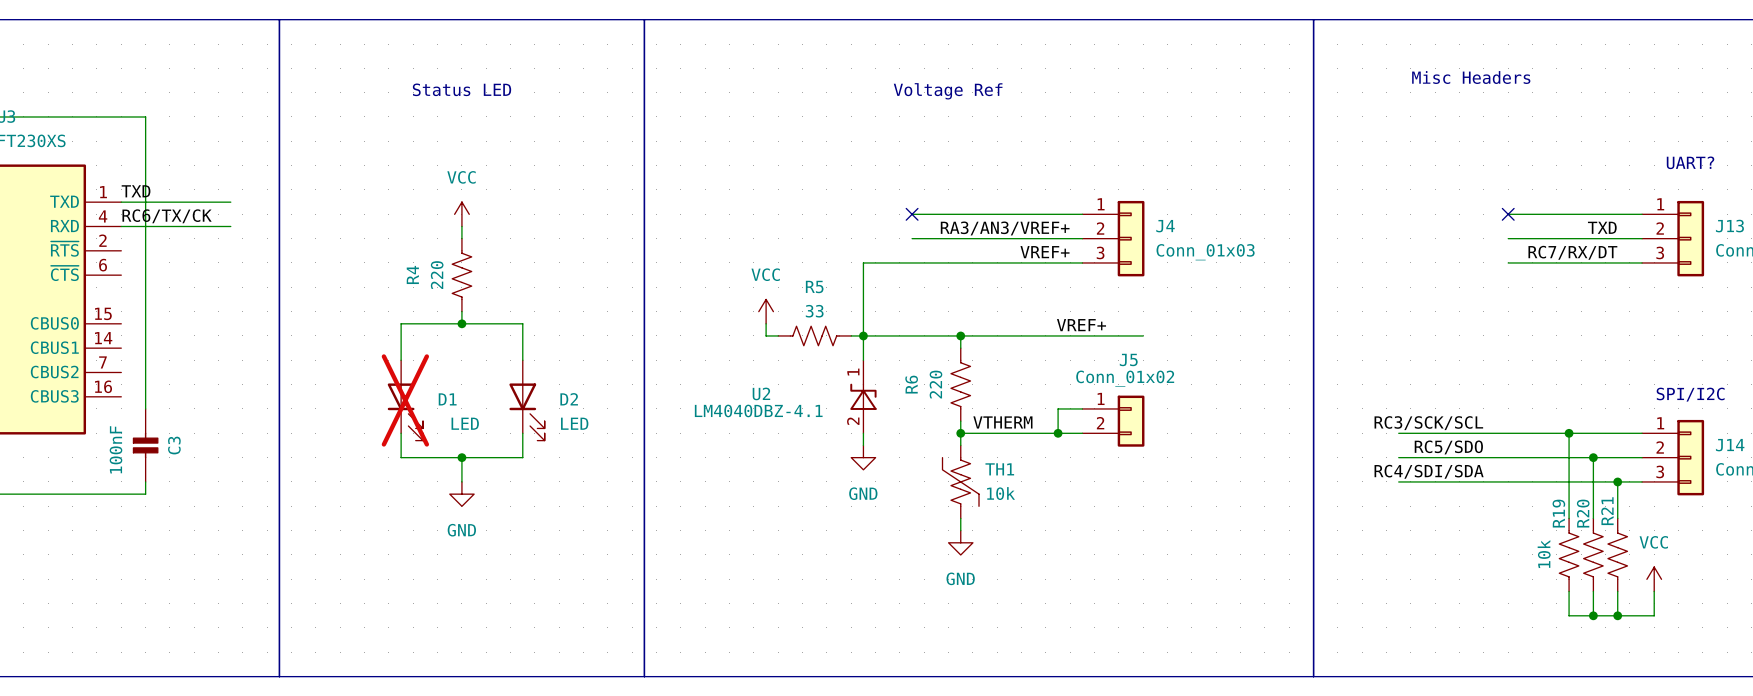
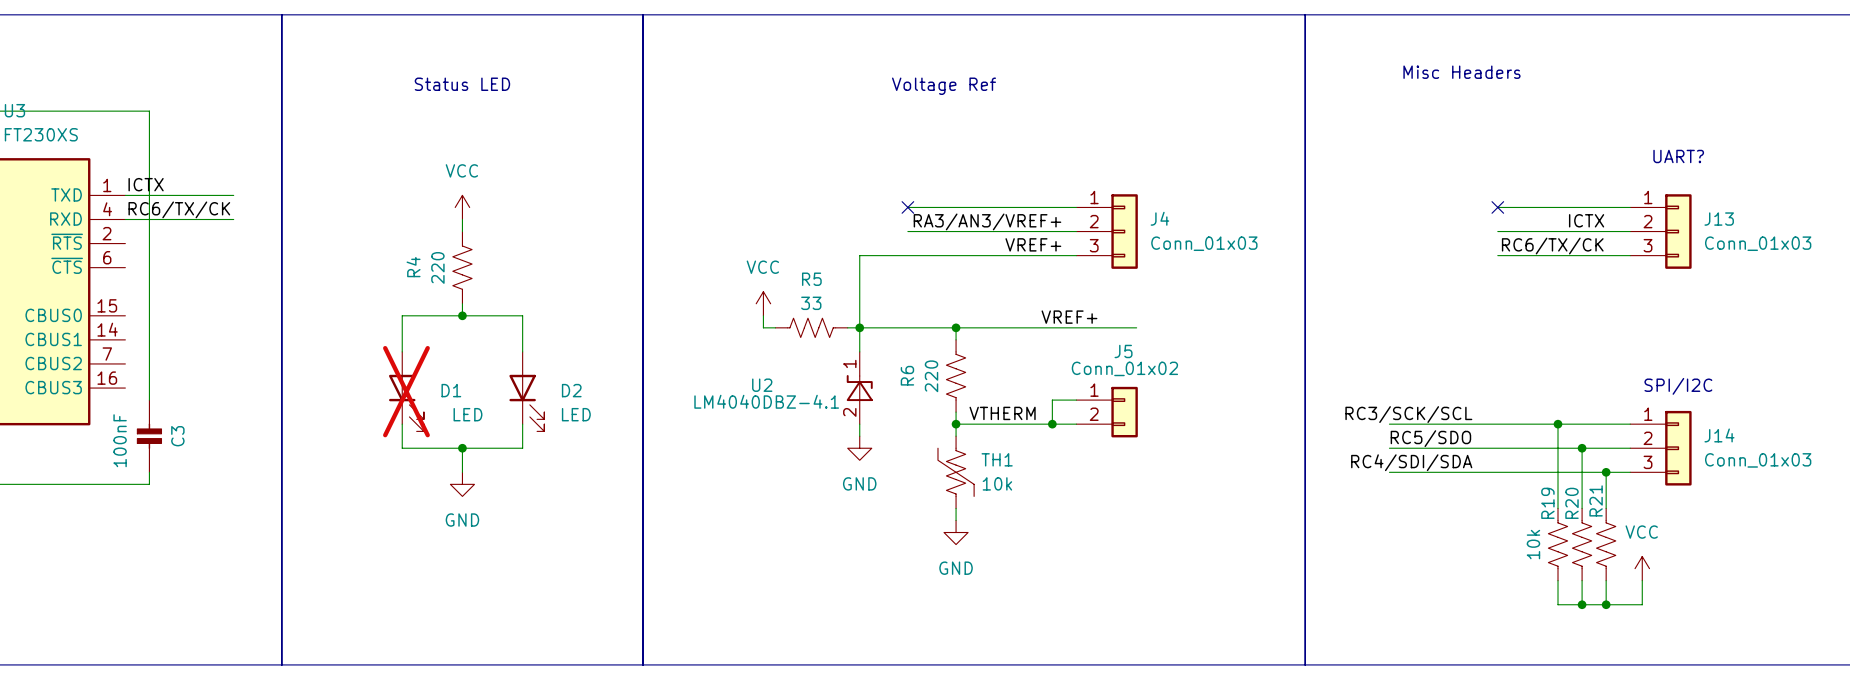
label: TXD (136, 191) -> ICTX (146, 184)
label: TXD (1602, 227) -> ICTX (1586, 220)
label: RC7/RX/DT (1572, 252) -> RC6/TX/CK (1552, 246)

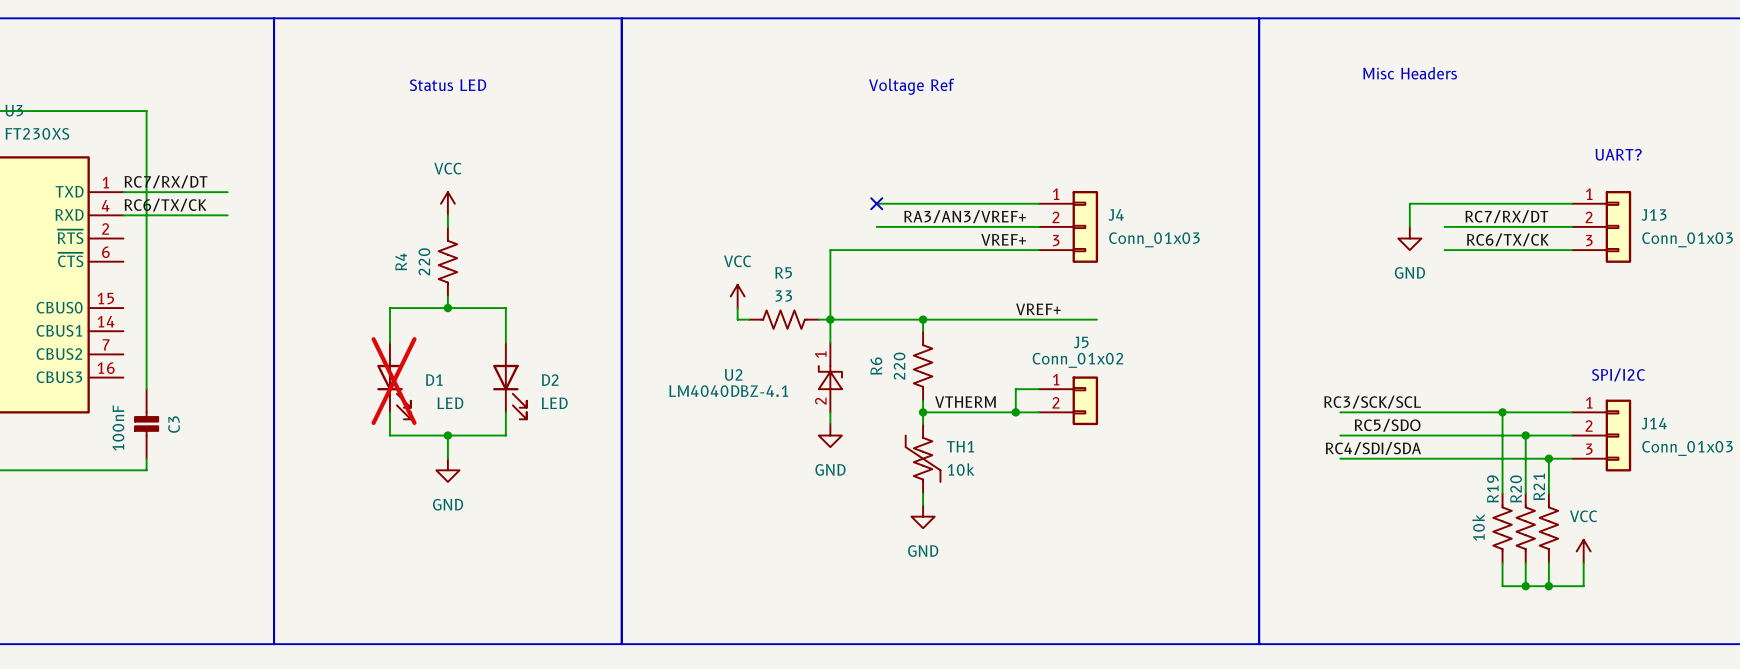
label: ICTX (146, 184) -> RC7/RX/DT (166, 181)
wire: none -> (1444, 203) (1409, 203) (1409, 226)
no-connect mark: (1497, 207) -> none
label: ICTX (1586, 220) -> RC7/RX/DT (1506, 216)
power symbol: none -> GND (1409, 238)

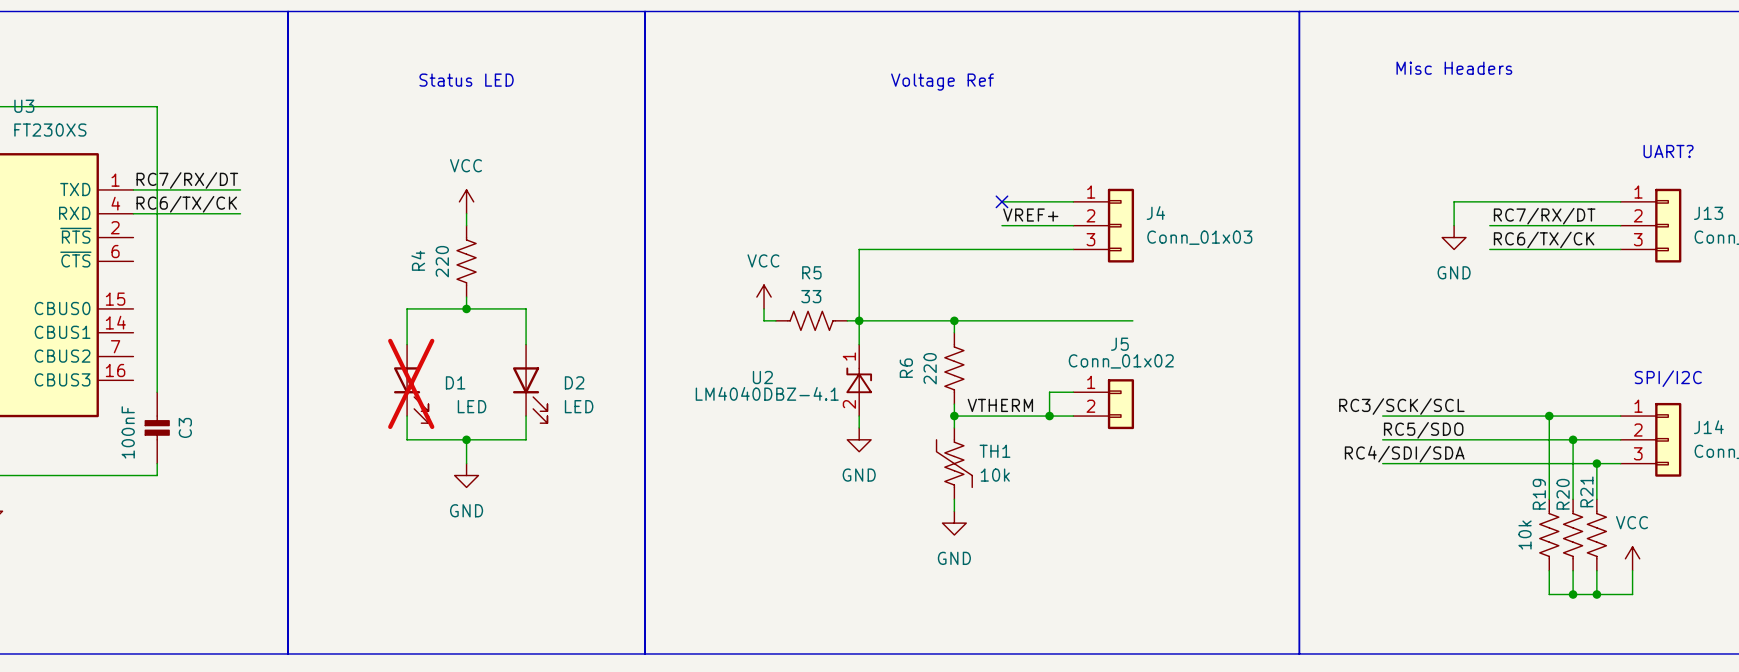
wire: (876, 203) (969, 203) -> none
no-connect mark: (876, 203) -> none
no-connect mark: none -> (1001, 201)
label: RA3/AN3/VREF+ (965, 216) -> VREF+ (1030, 215)
wire: (876, 226) (969, 226) -> none
label: VREF+ (1003, 239) -> none
label: VREF+ (1038, 309) -> none

